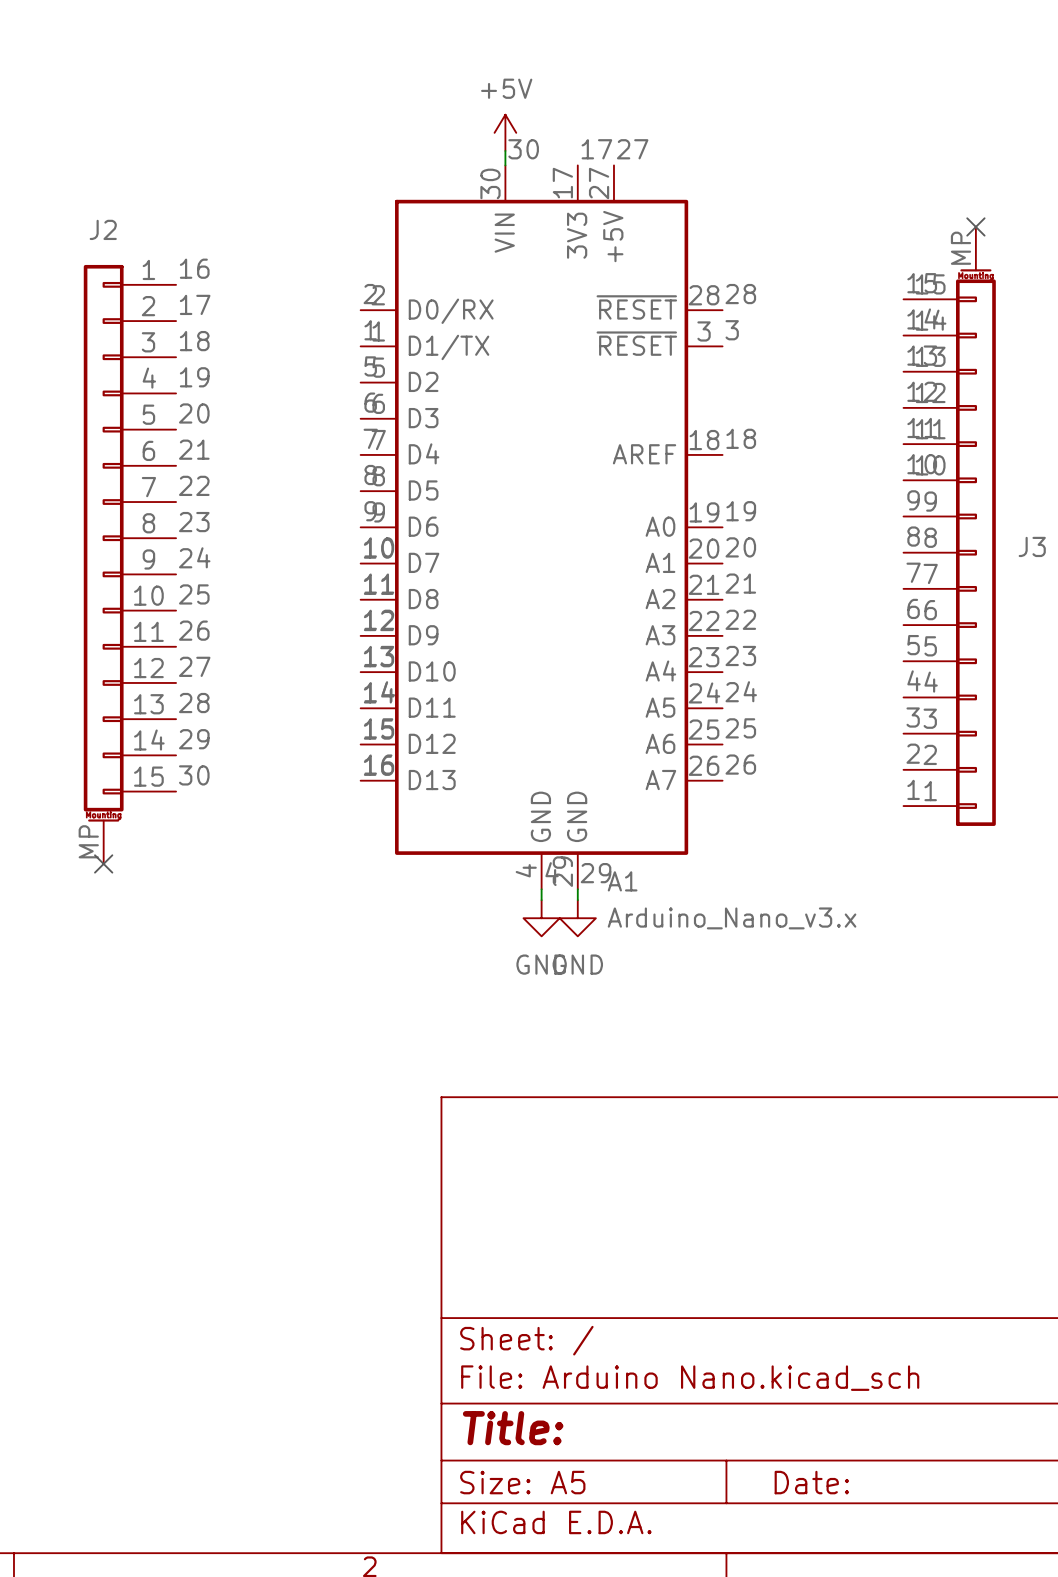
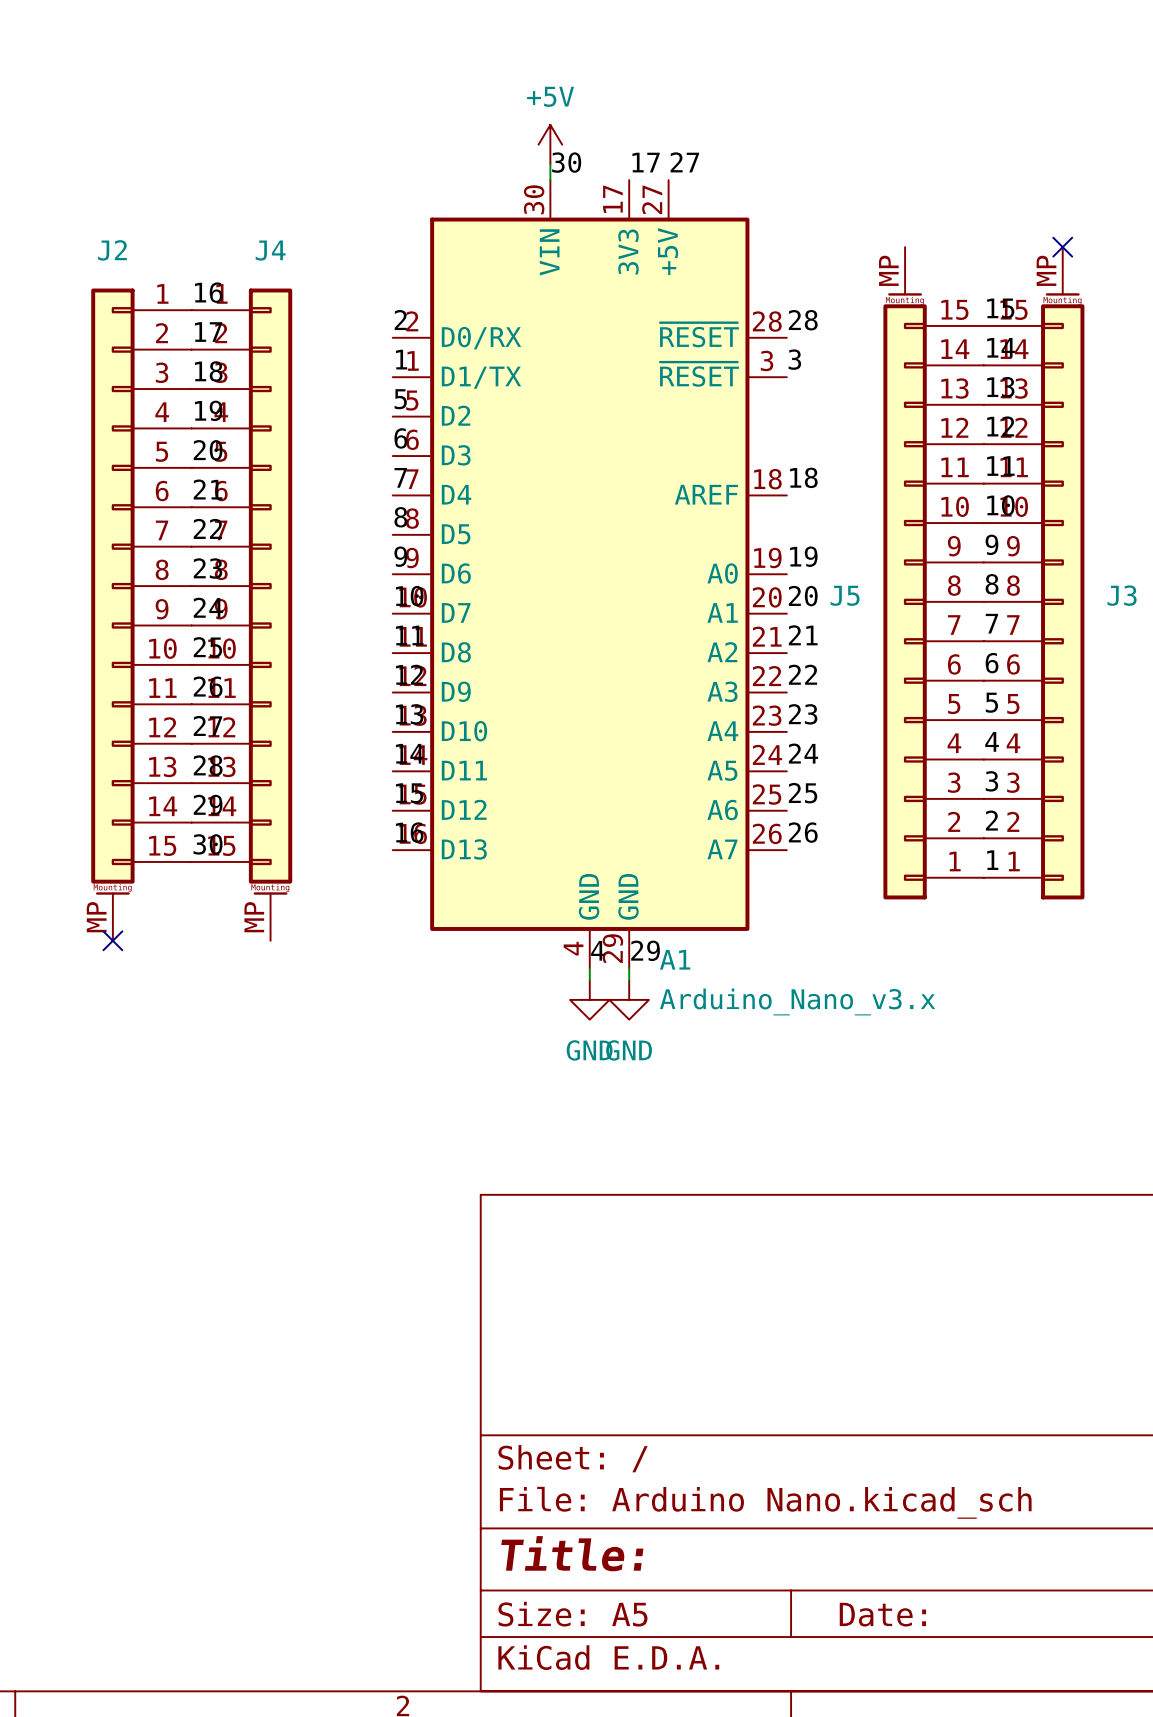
J5: none -> (933, 573)
J4: none -> (241, 614)

